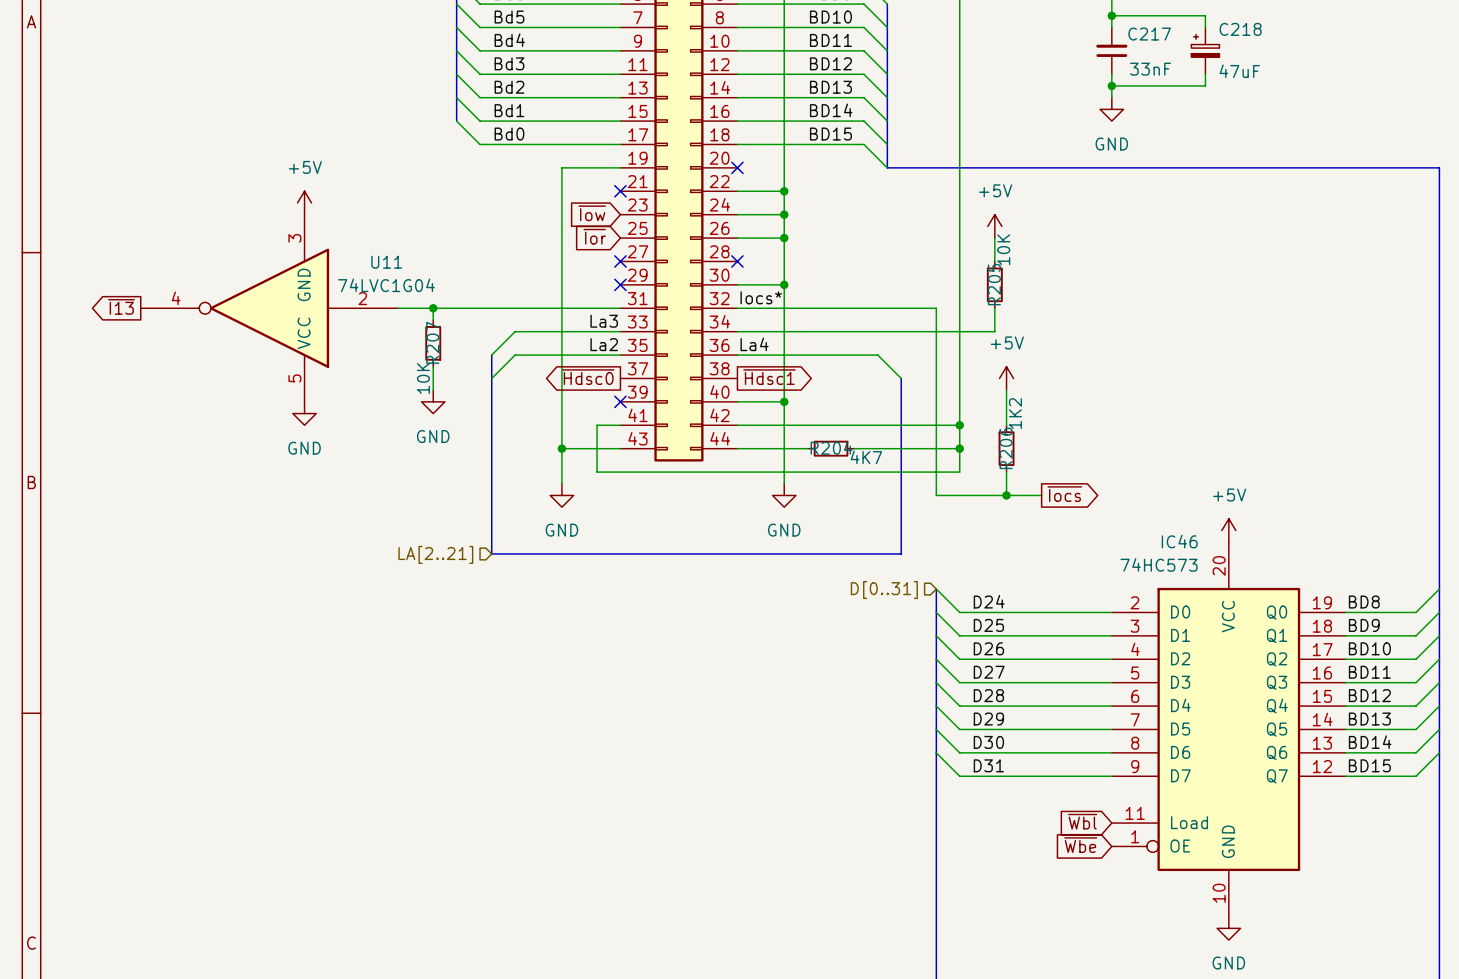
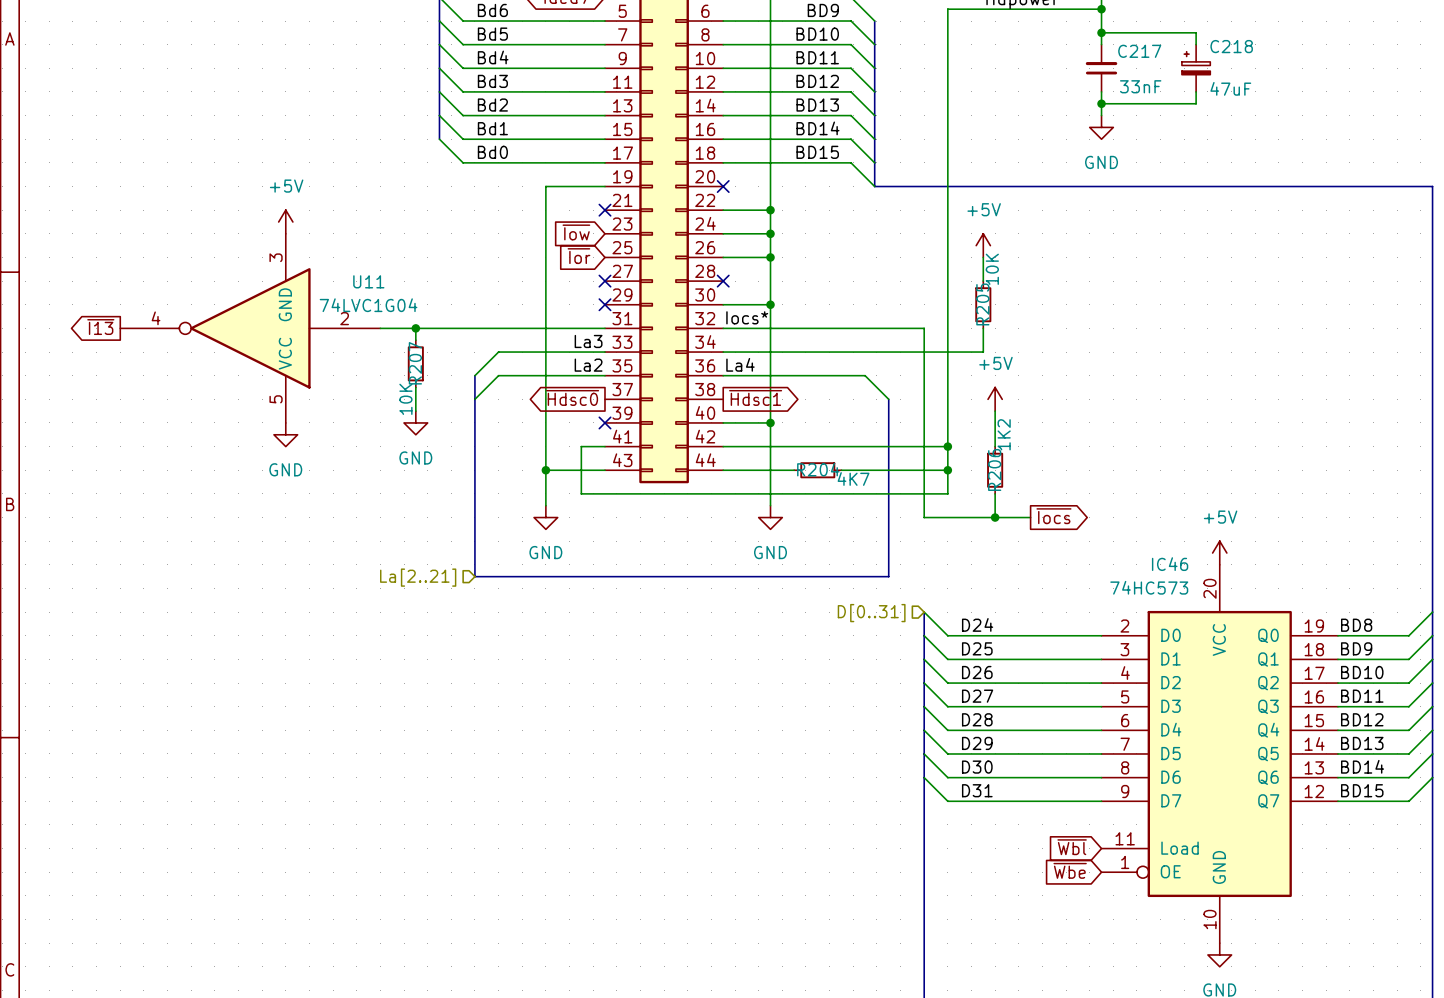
hierarchical label: LA[2..21] (435, 554) -> La[2..21] (418, 577)

